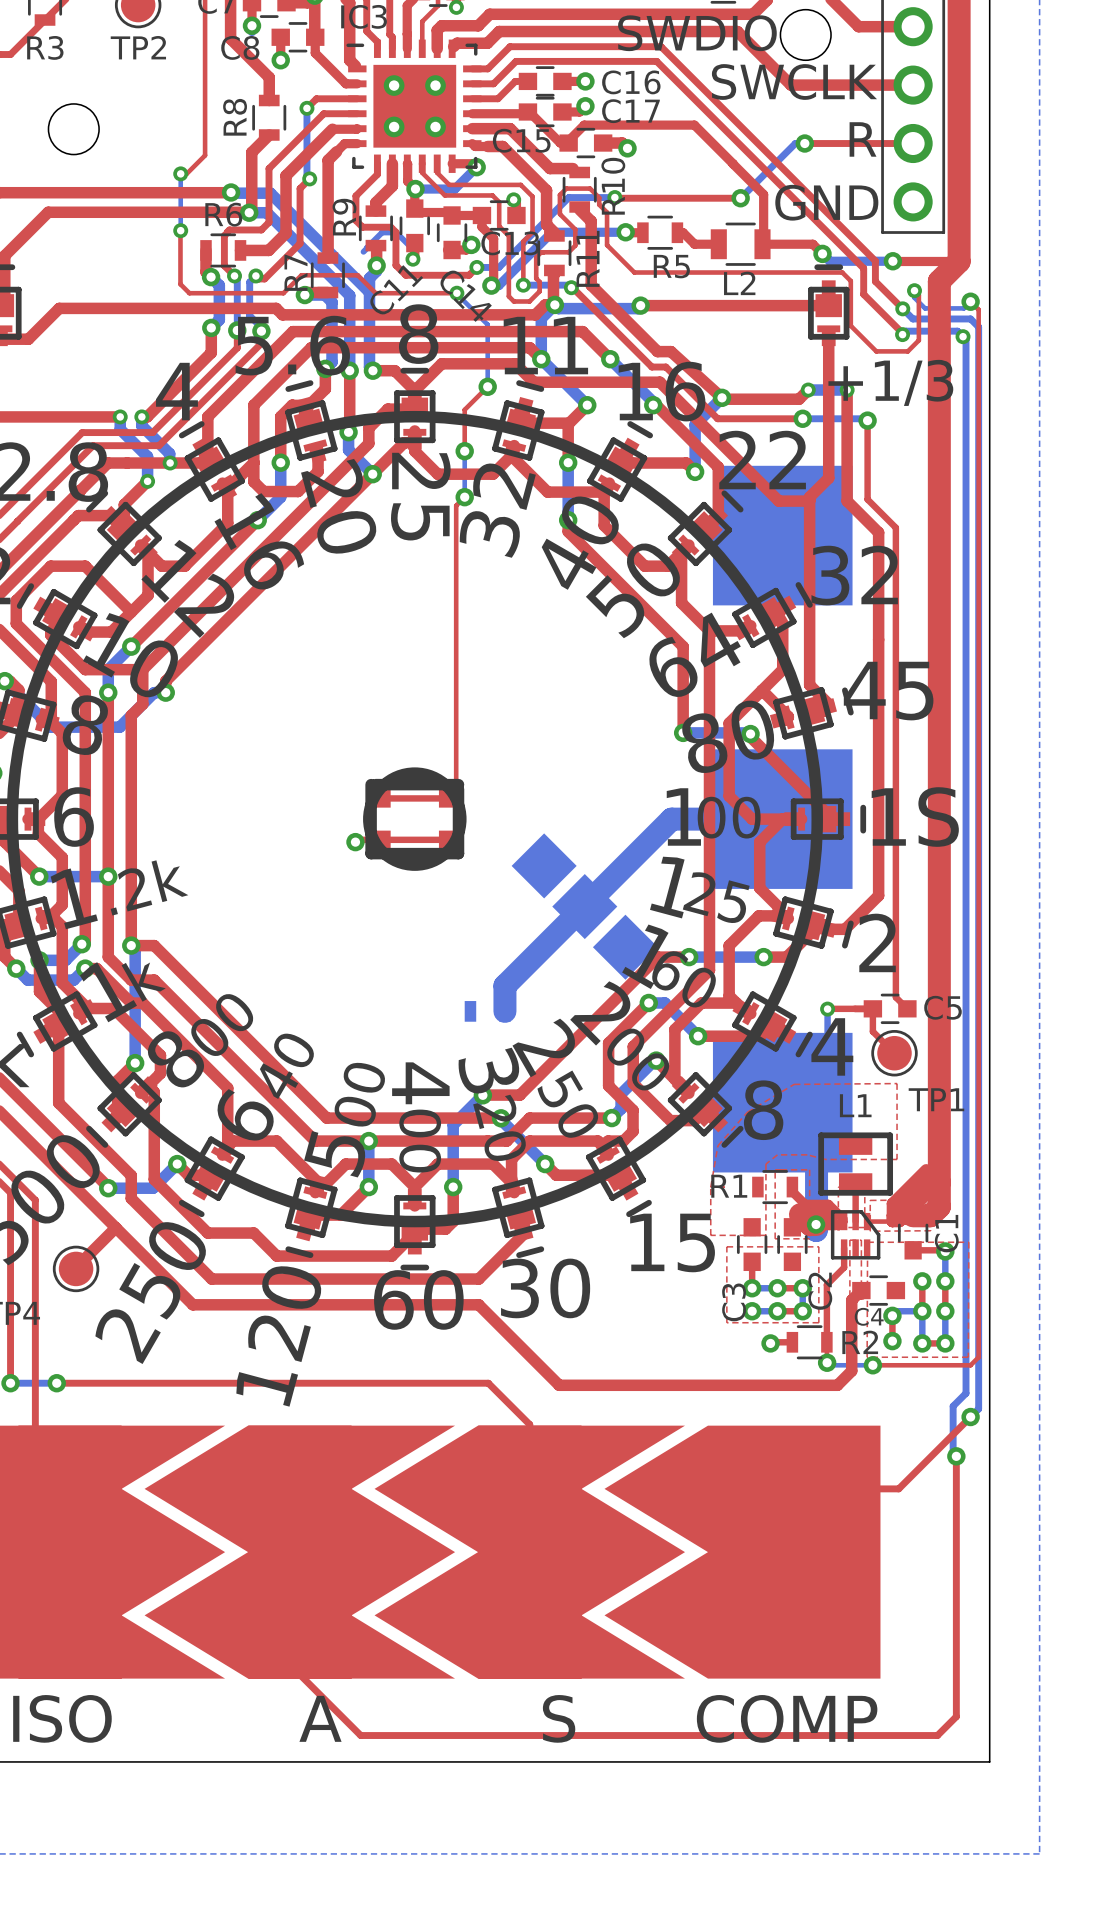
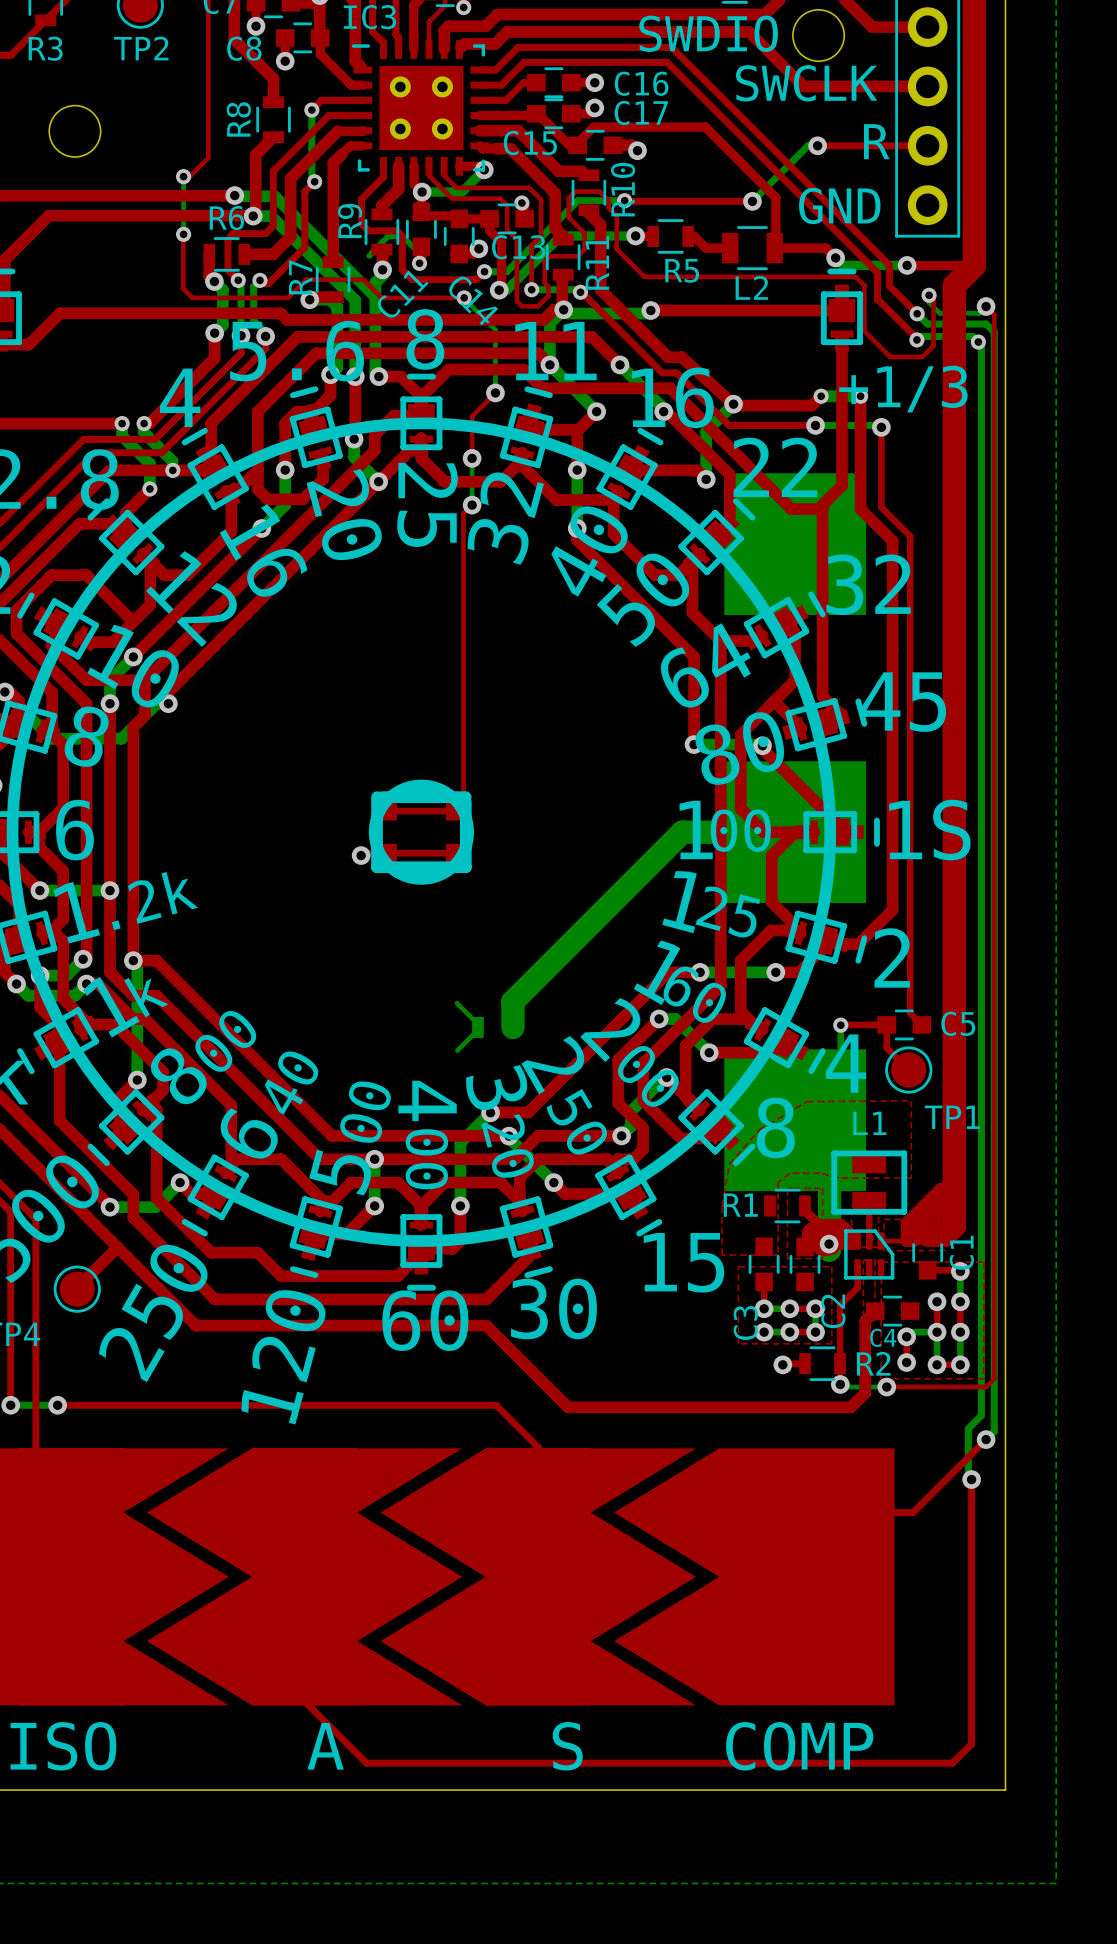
part: (584, 906) -> none
bottom track: none -> (456, 1003) (477, 1024) (477, 1030) (457, 1050)

